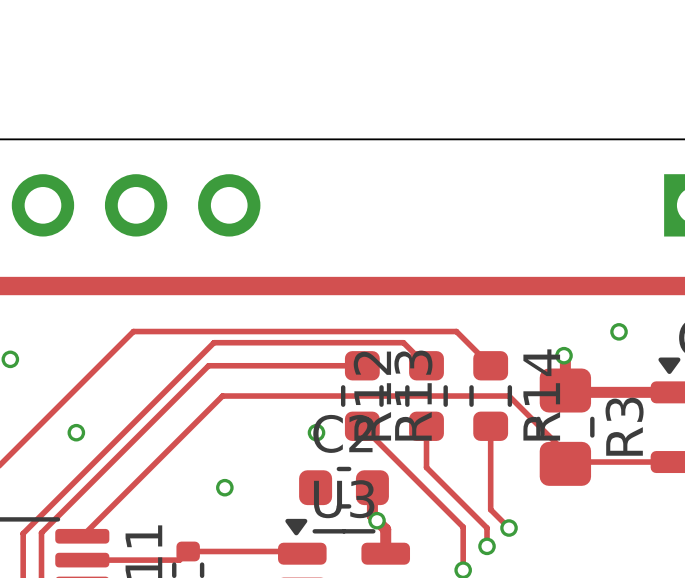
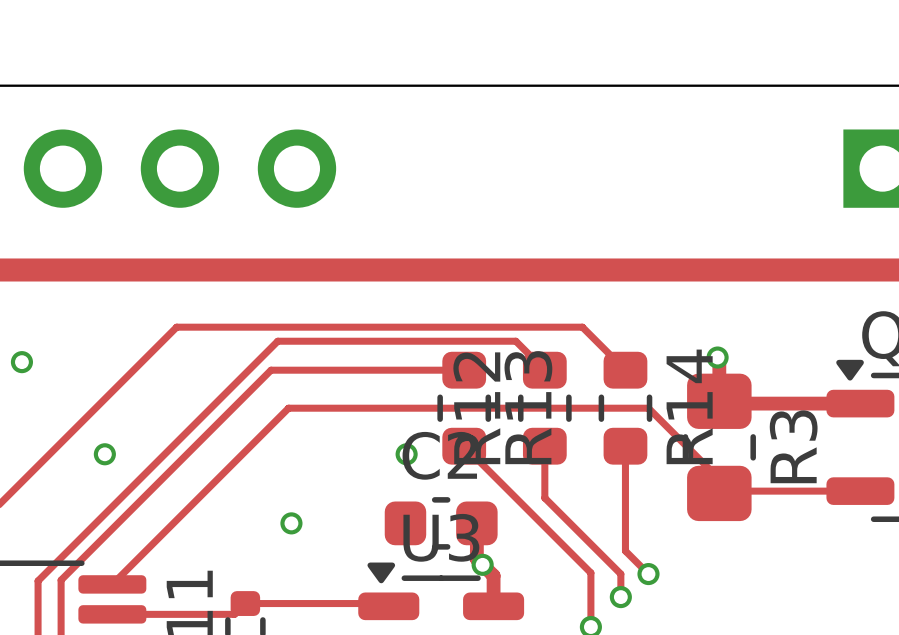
via: (619, 331) -> none

